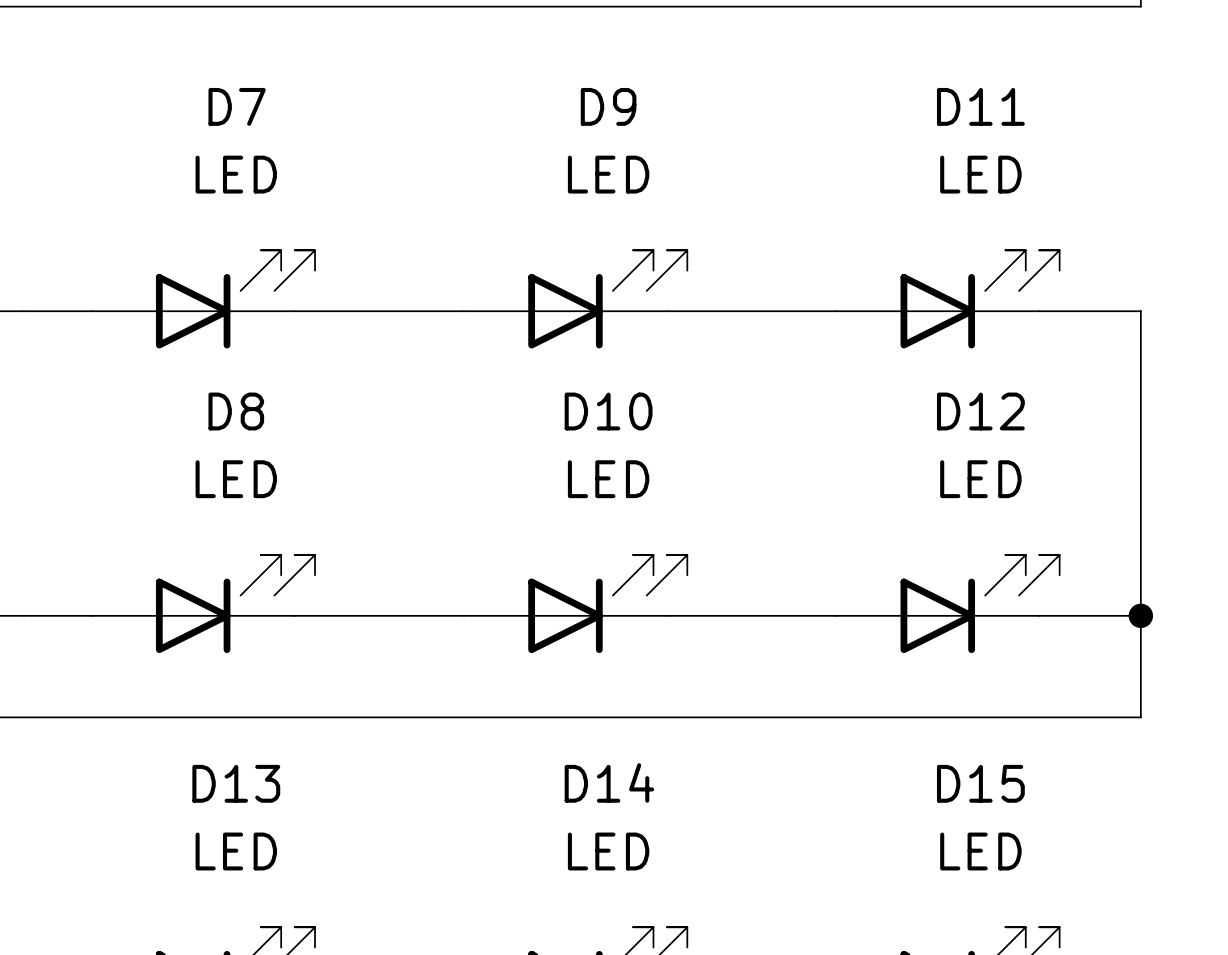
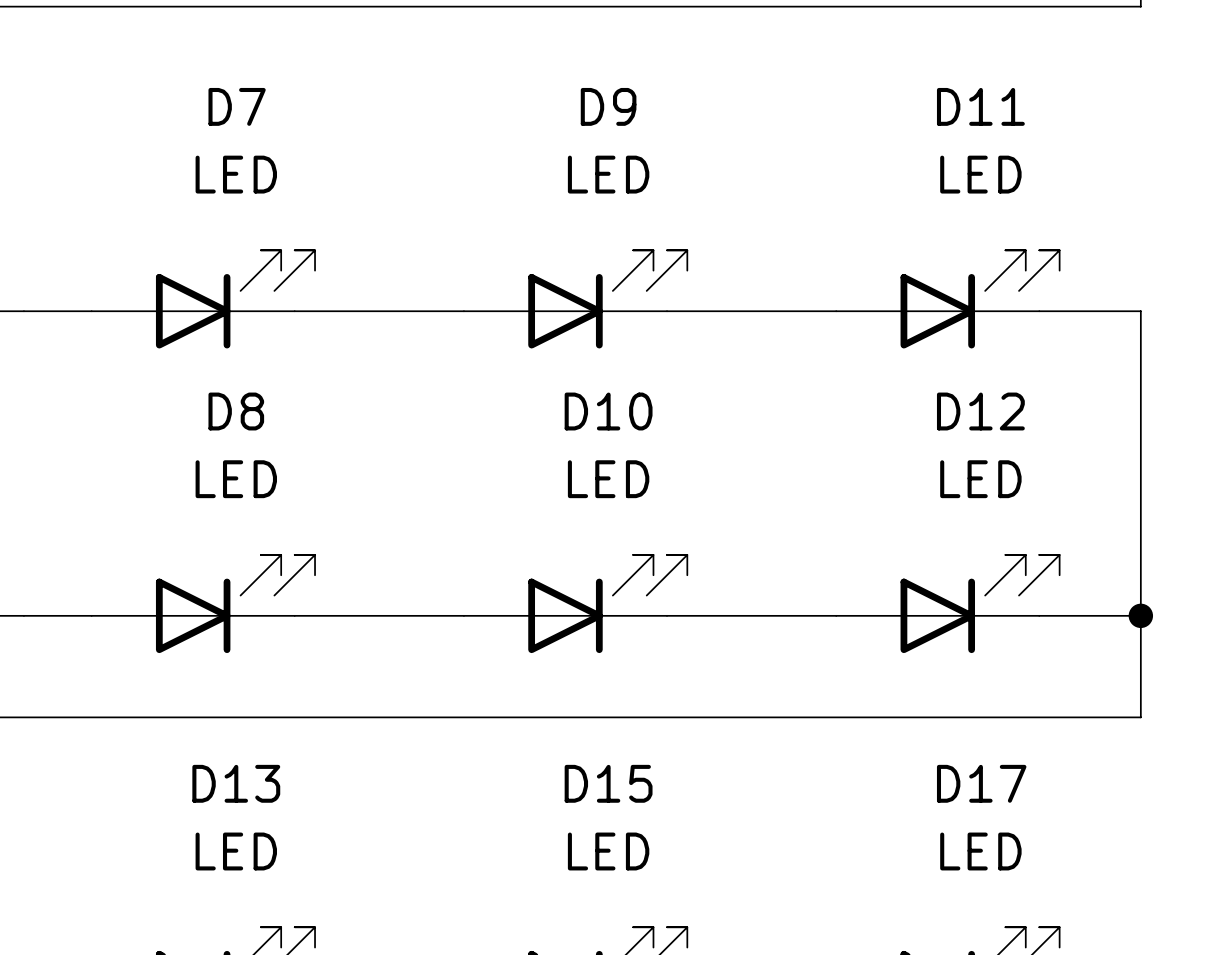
D14 name: D14 (609, 783) -> D15 (608, 783)
D15 name: D15 (980, 783) -> D17 (981, 783)

